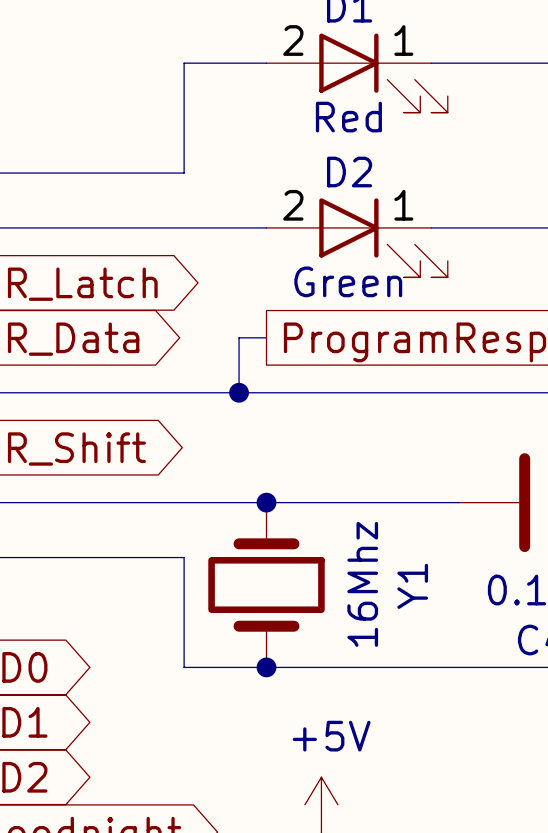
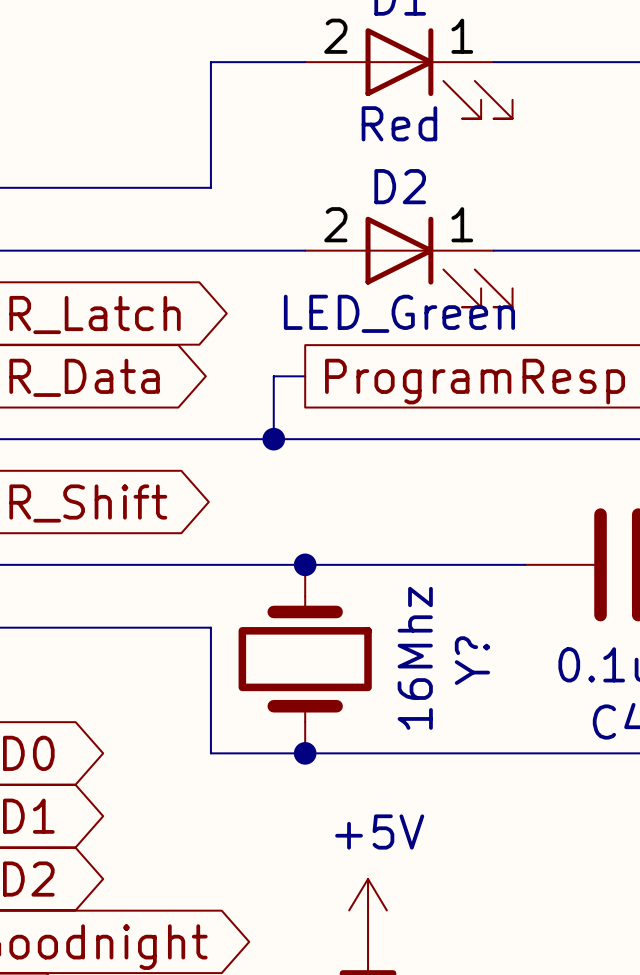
D2 value: Green (348, 281) -> LED_Green (399, 313)
Y1 name: Y1 (412, 586) -> Y? (472, 660)

